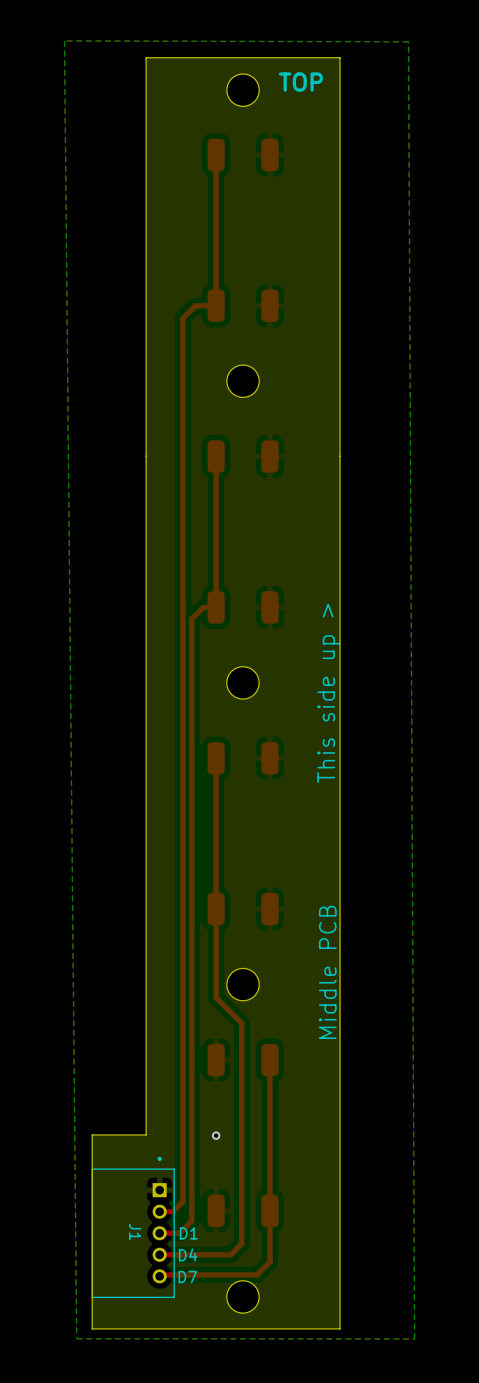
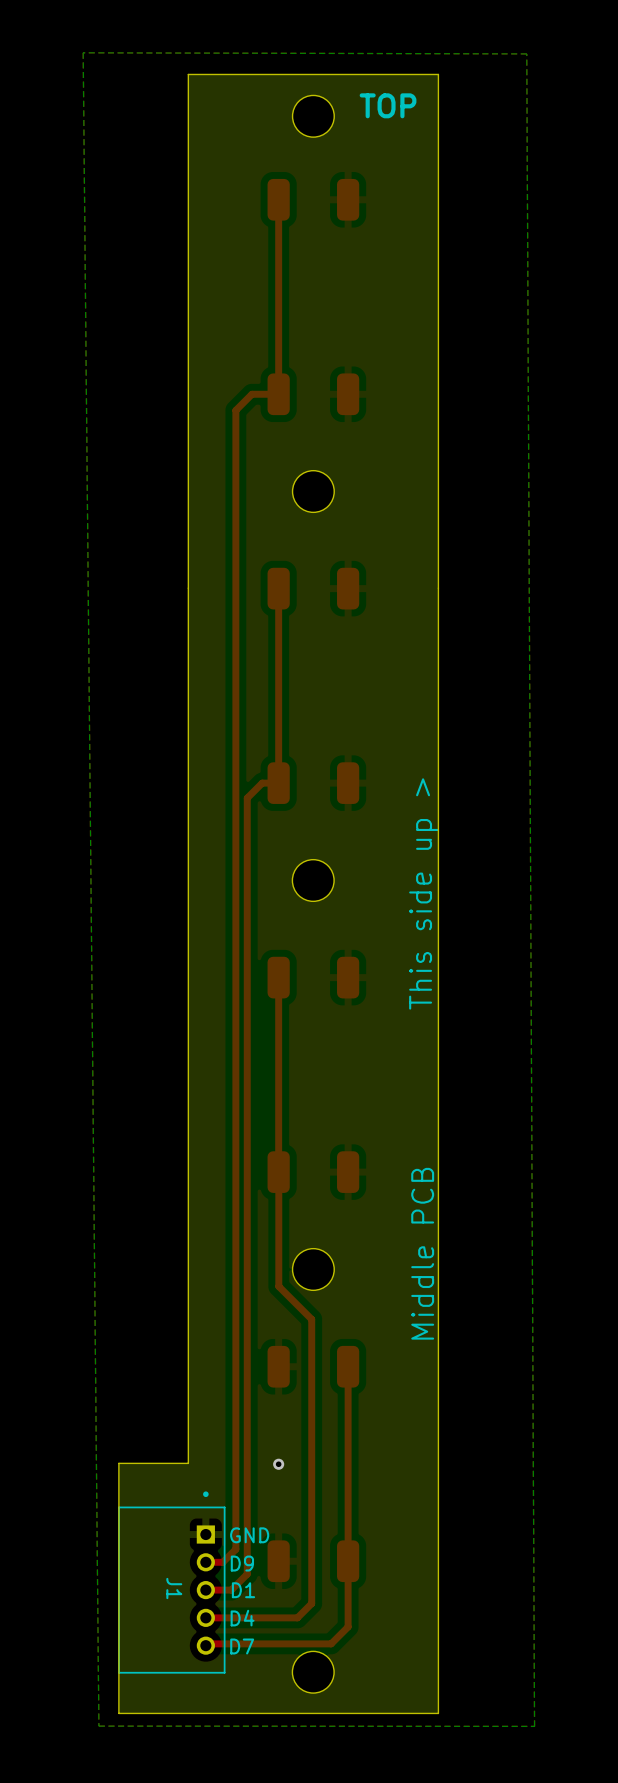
text: none -> GND (249, 1535)
text: none -> D9 (242, 1563)

